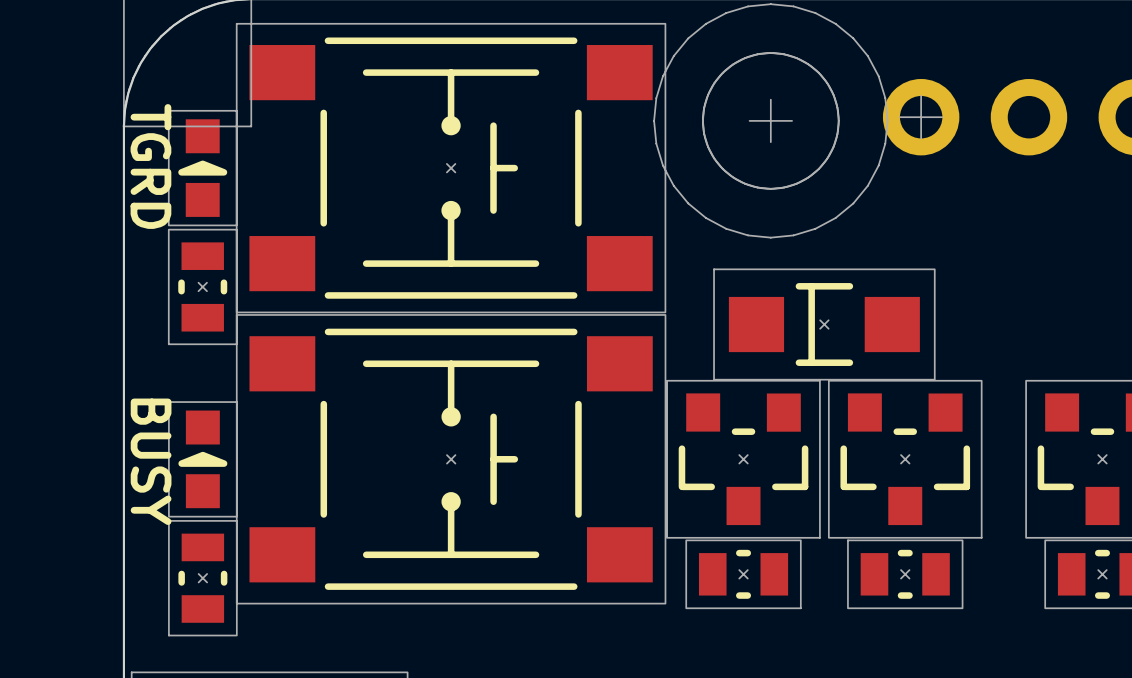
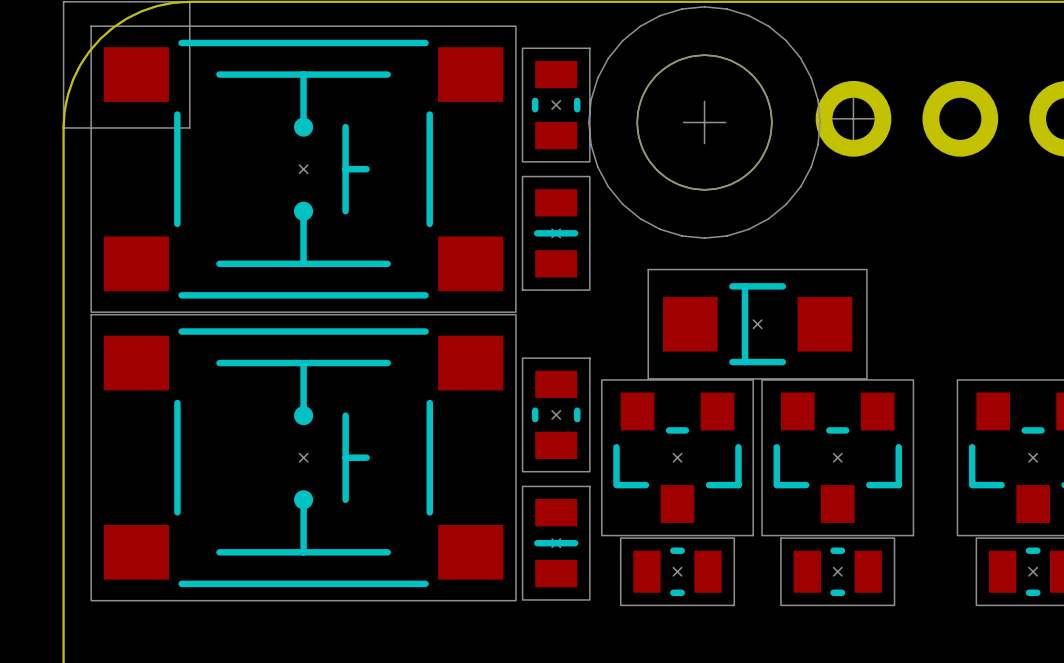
part: none -> (556, 105)
part: TGRD (202, 168) -> none
part position: (451, 168) -> (303, 169)
part: none -> (556, 233)
part: (202, 286) -> none
part: none -> (556, 414)
part: BUSY (202, 459) -> none
part position: (451, 459) -> (303, 457)
part: none -> (556, 543)
part: (202, 578) -> none

